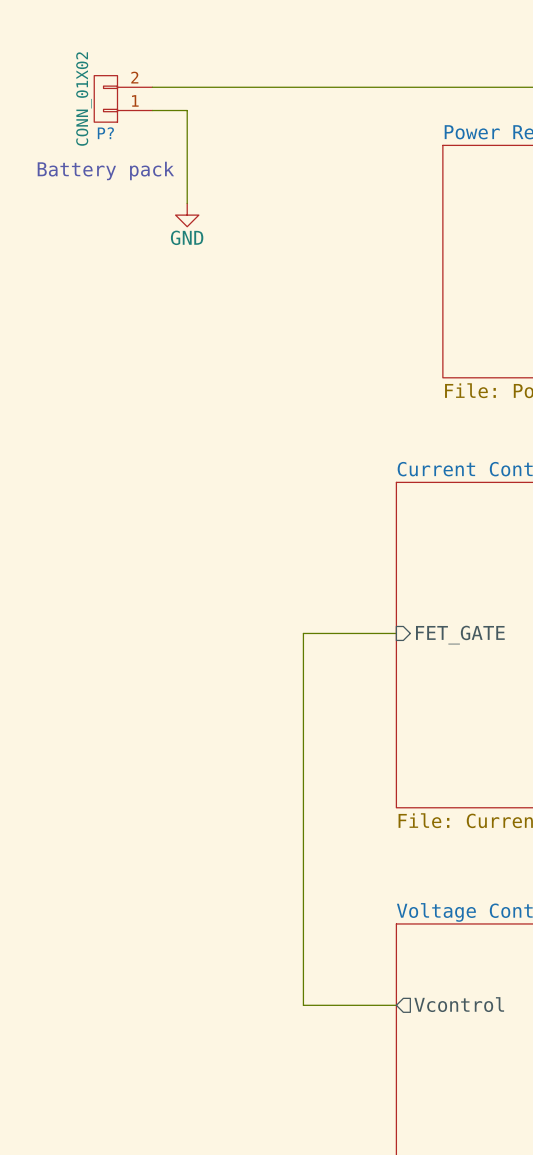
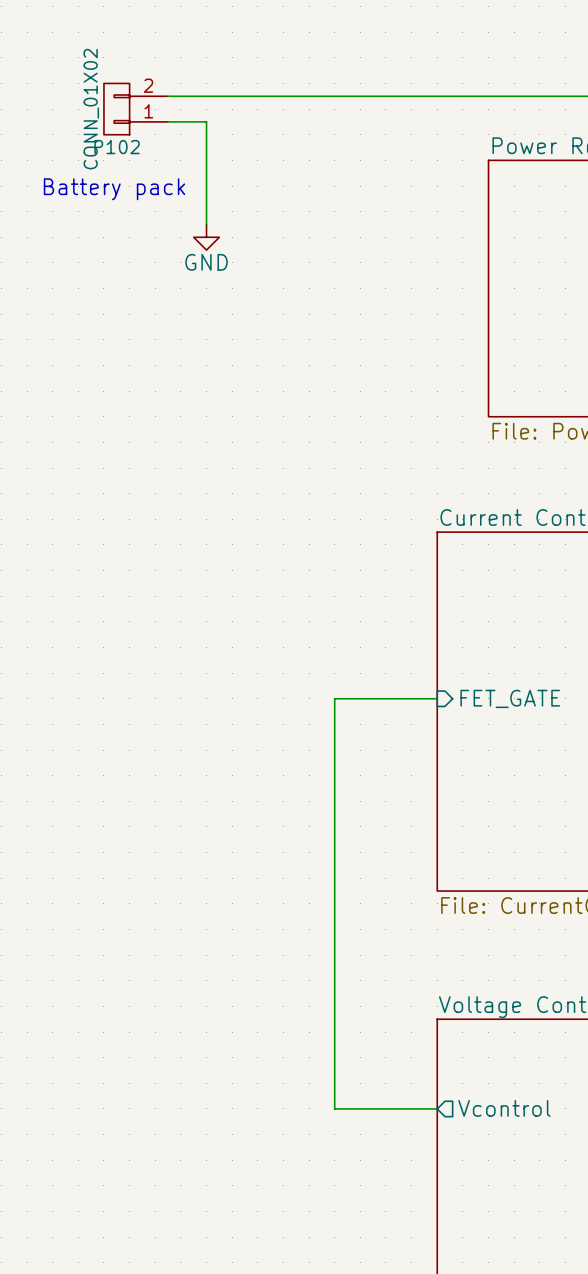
P? name: P? (105, 133) -> P102 (117, 147)

